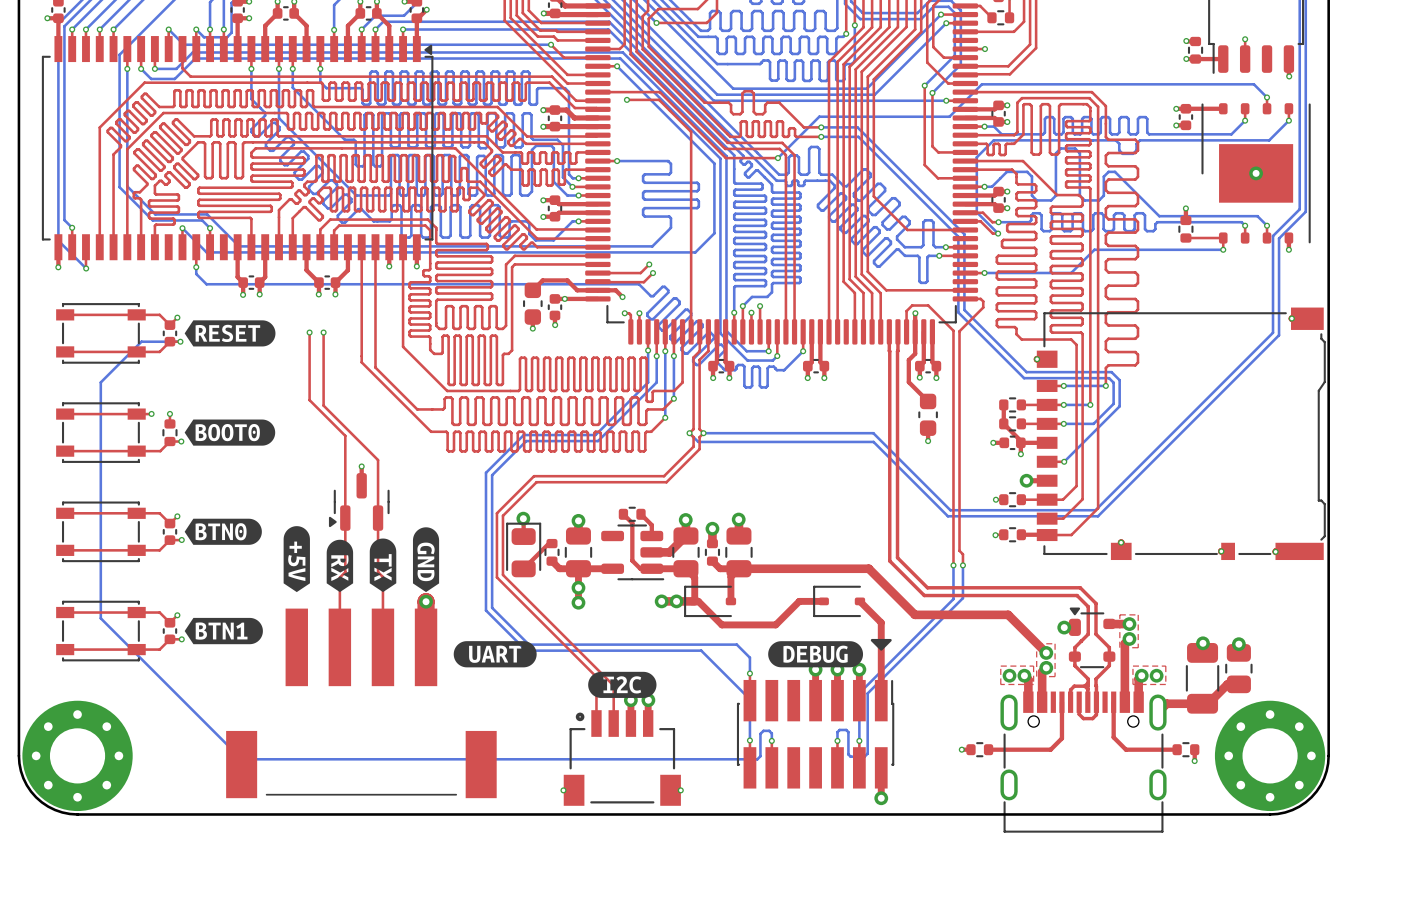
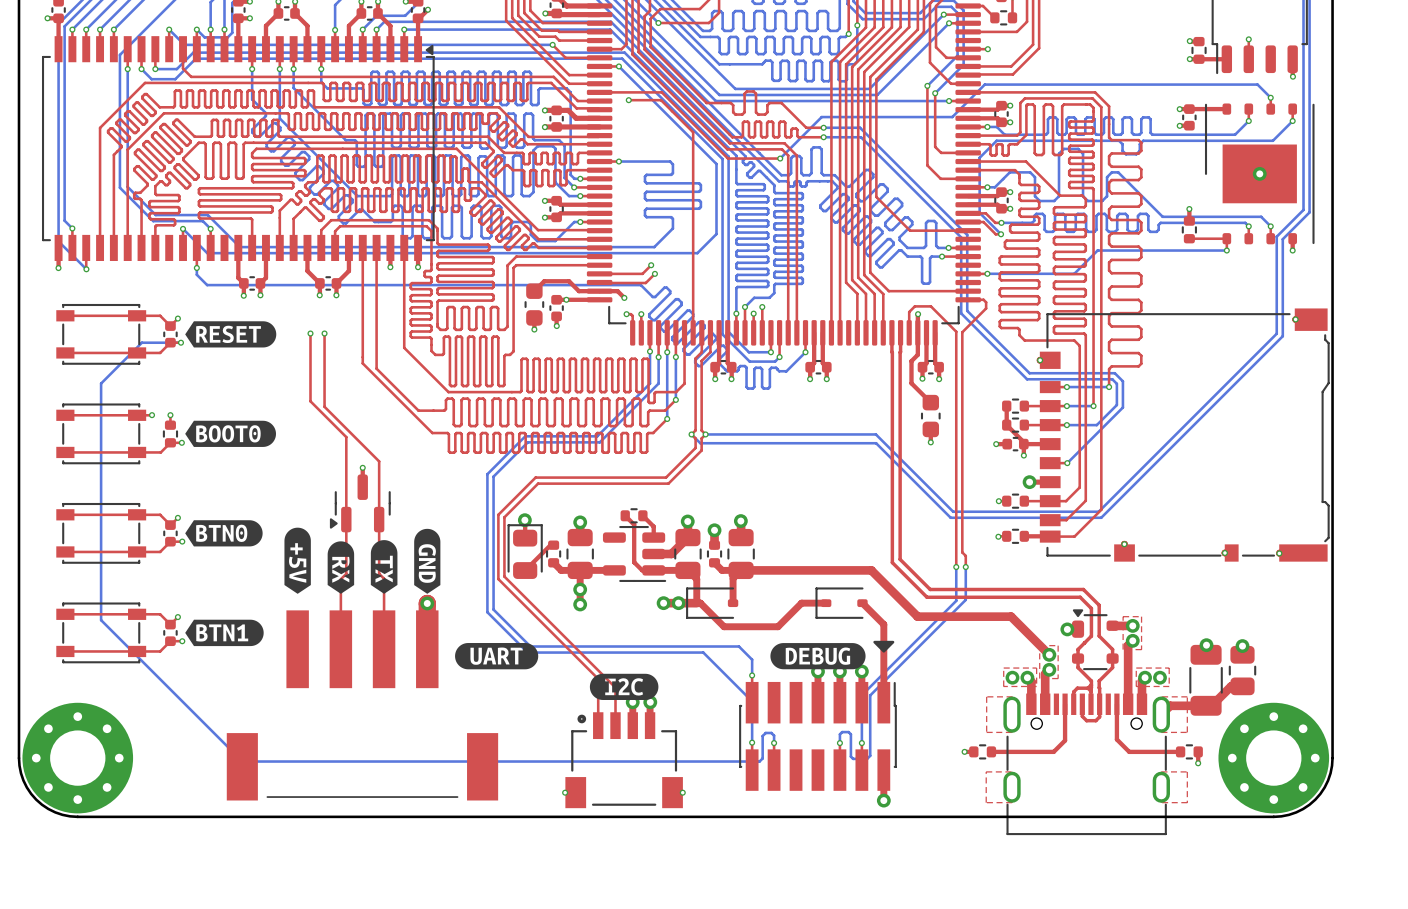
top zone outline: none -> (986, 696) (1012, 696) (1012, 732) (986, 732) (986, 696)
top zone outline: none -> (1161, 696) (1187, 696) (1187, 732) (1161, 732) (1161, 696)
top zone outline: none -> (986, 771) (1012, 771) (1012, 802) (986, 802) (986, 771)
top zone outline: none -> (1161, 771) (1161, 802) (1187, 802) (1187, 771) (1161, 771)

